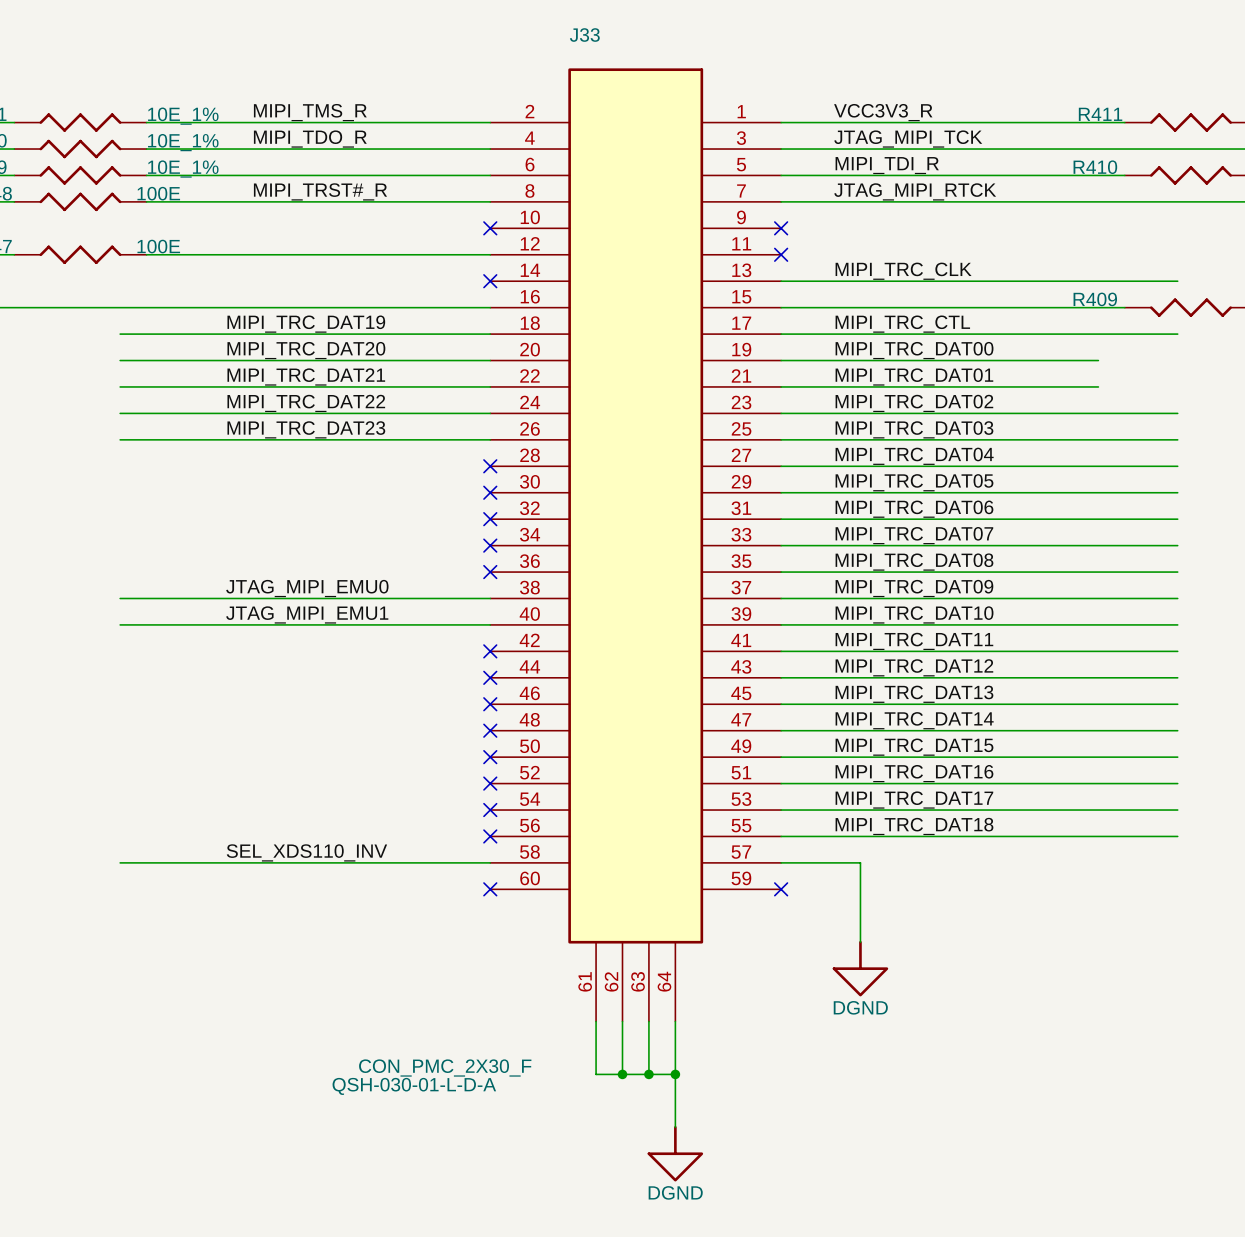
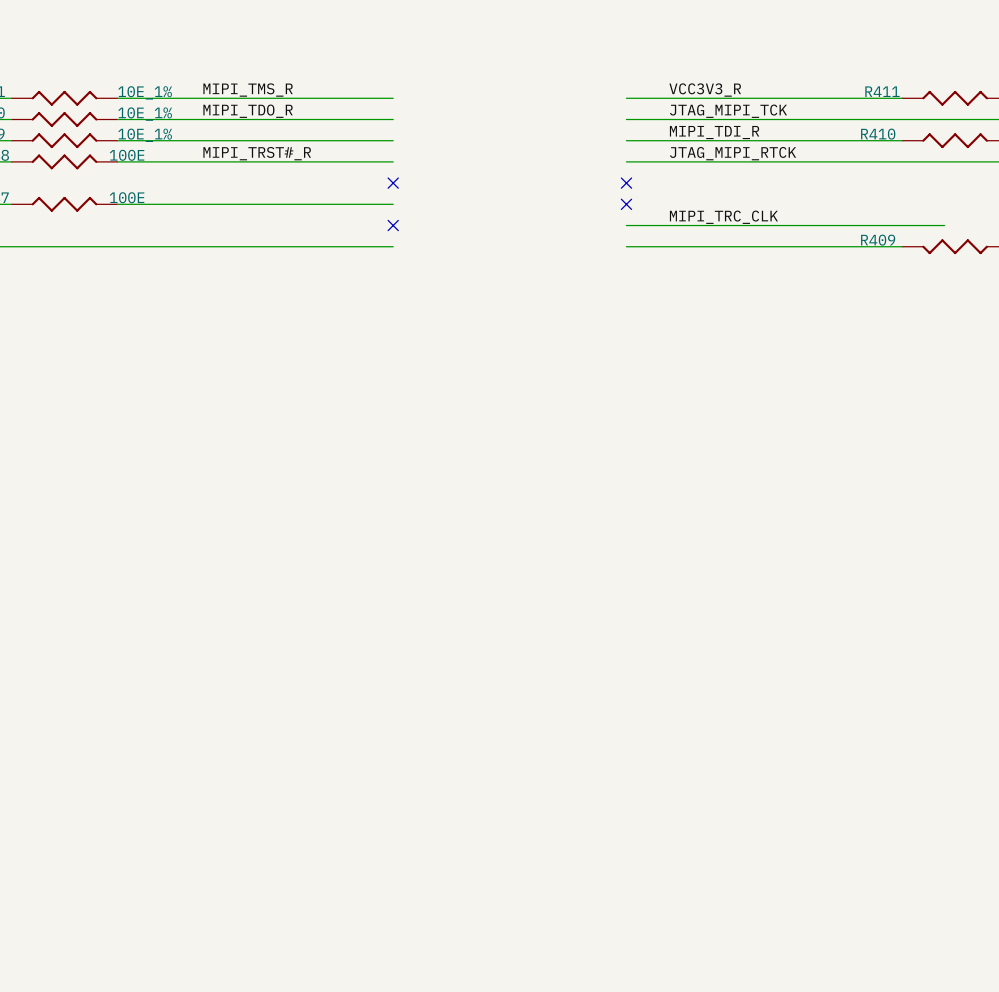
label: MIPI_TRC_DAT19 (306, 324) -> none
label: MIPI_TRC_CTL (902, 324) -> none
wire: (120, 334) (490, 334) -> none
wire: (781, 334) (1177, 334) -> none
label: MIPI_TRC_DAT20 (306, 350) -> none
label: MIPI_TRC_DAT00 (914, 350) -> none
wire: (120, 360) (490, 360) -> none
wire: (781, 360) (1098, 360) -> none
label: MIPI_TRC_DAT21 (306, 376) -> none
label: MIPI_TRC_DAT01 (914, 376) -> none
wire: (120, 386) (490, 386) -> none
wire: (781, 386) (1098, 386) -> none
label: MIPI_TRC_DAT22 (306, 403) -> none
label: MIPI_TRC_DAT02 (914, 403) -> none
wire: (120, 413) (490, 413) -> none
wire: (781, 413) (1177, 413) -> none
label: MIPI_TRC_DAT23 (306, 429) -> none
label: MIPI_TRC_DAT03 (914, 429) -> none
wire: (120, 439) (490, 439) -> none
wire: (781, 439) (1177, 439) -> none
label: MIPI_TRC_DAT04 (914, 456) -> none
no-connect mark: (490, 466) -> none
wire: (781, 466) (1177, 466) -> none
label: MIPI_TRC_DAT05 (914, 482) -> none
no-connect mark: (490, 492) -> none
wire: (781, 492) (1177, 492) -> none
label: MIPI_TRC_DAT06 (914, 509) -> none
no-connect mark: (490, 519) -> none
wire: (781, 519) (1177, 519) -> none
label: MIPI_TRC_DAT07 (914, 535) -> none
J33: CON_PMC_2X30_F (635, 544) -> none
no-connect mark: (490, 545) -> none
wire: (781, 545) (1177, 545) -> none
label: MIPI_TRC_DAT08 (914, 562) -> none
no-connect mark: (490, 572) -> none
wire: (781, 572) (1177, 572) -> none
label: JTAG_MIPI_EMU0 (307, 588) -> none
label: MIPI_TRC_DAT09 (914, 588) -> none
wire: (120, 598) (490, 598) -> none
wire: (781, 598) (1177, 598) -> none
label: JTAG_MIPI_EMU1 (307, 614) -> none
label: MIPI_TRC_DAT10 (914, 614) -> none
wire: (120, 624) (490, 624) -> none
wire: (781, 624) (1177, 624) -> none
label: MIPI_TRC_DAT11 (914, 641) -> none
no-connect mark: (490, 651) -> none
wire: (781, 651) (1177, 651) -> none
label: MIPI_TRC_DAT12 (914, 667) -> none
no-connect mark: (490, 677) -> none
wire: (781, 677) (1177, 677) -> none
label: MIPI_TRC_DAT13 (914, 694) -> none
no-connect mark: (490, 704) -> none
wire: (781, 704) (1177, 704) -> none
label: MIPI_TRC_DAT14 (914, 720) -> none
no-connect mark: (490, 730) -> none
wire: (781, 730) (1177, 730) -> none
label: MIPI_TRC_DAT15 (914, 747) -> none
no-connect mark: (490, 757) -> none
wire: (781, 757) (1177, 757) -> none
label: MIPI_TRC_DAT16 (914, 773) -> none
no-connect mark: (490, 783) -> none
wire: (781, 783) (1177, 783) -> none
label: MIPI_TRC_DAT17 (914, 800) -> none
no-connect mark: (490, 810) -> none
wire: (781, 810) (1177, 810) -> none
label: MIPI_TRC_DAT18 (914, 826) -> none
no-connect mark: (490, 836) -> none
wire: (781, 836) (1177, 836) -> none
label: SEL_XDS110_INV (306, 852) -> none
wire: (120, 862) (490, 862) -> none
wire: (781, 862) (860, 862) (860, 942) -> none
no-connect mark: (490, 889) -> none
no-connect mark: (781, 889) -> none
power symbol: DGND (860, 968) -> none
wire: (596, 1021) (596, 1074) (675, 1074) -> none
wire: (622, 1021) (622, 1074) -> none
wire: (648, 1021) (648, 1074) -> none
wire: (675, 1021) (675, 1127) -> none
junction: (622, 1074) -> none
junction: (648, 1074) -> none
junction: (675, 1074) -> none
power symbol: DGND (675, 1153) -> none

